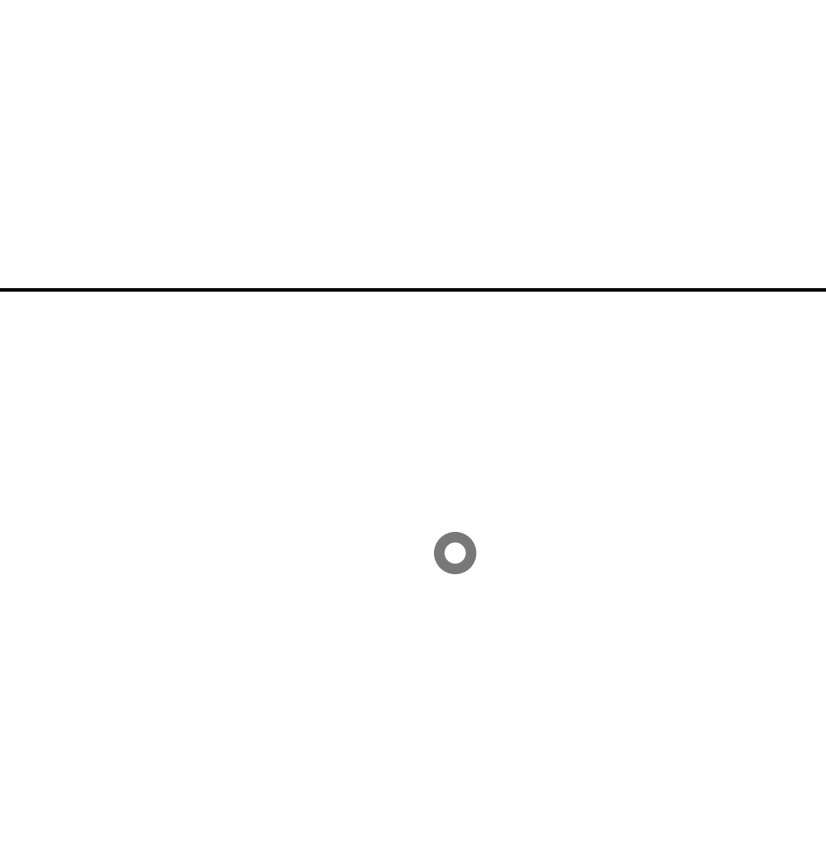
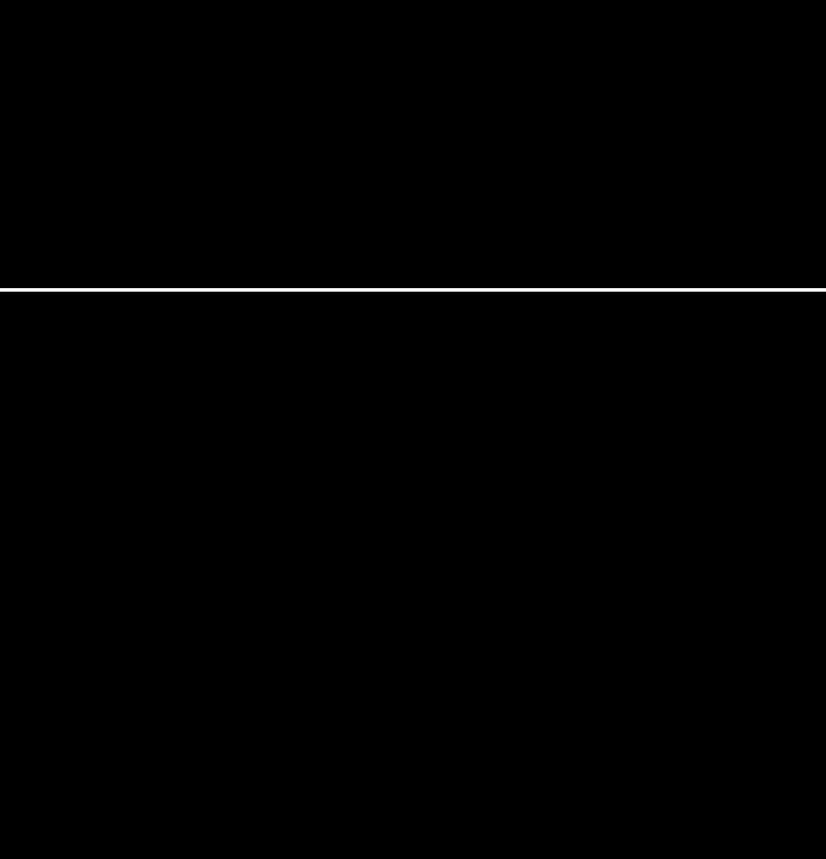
via: (455, 553) -> none

